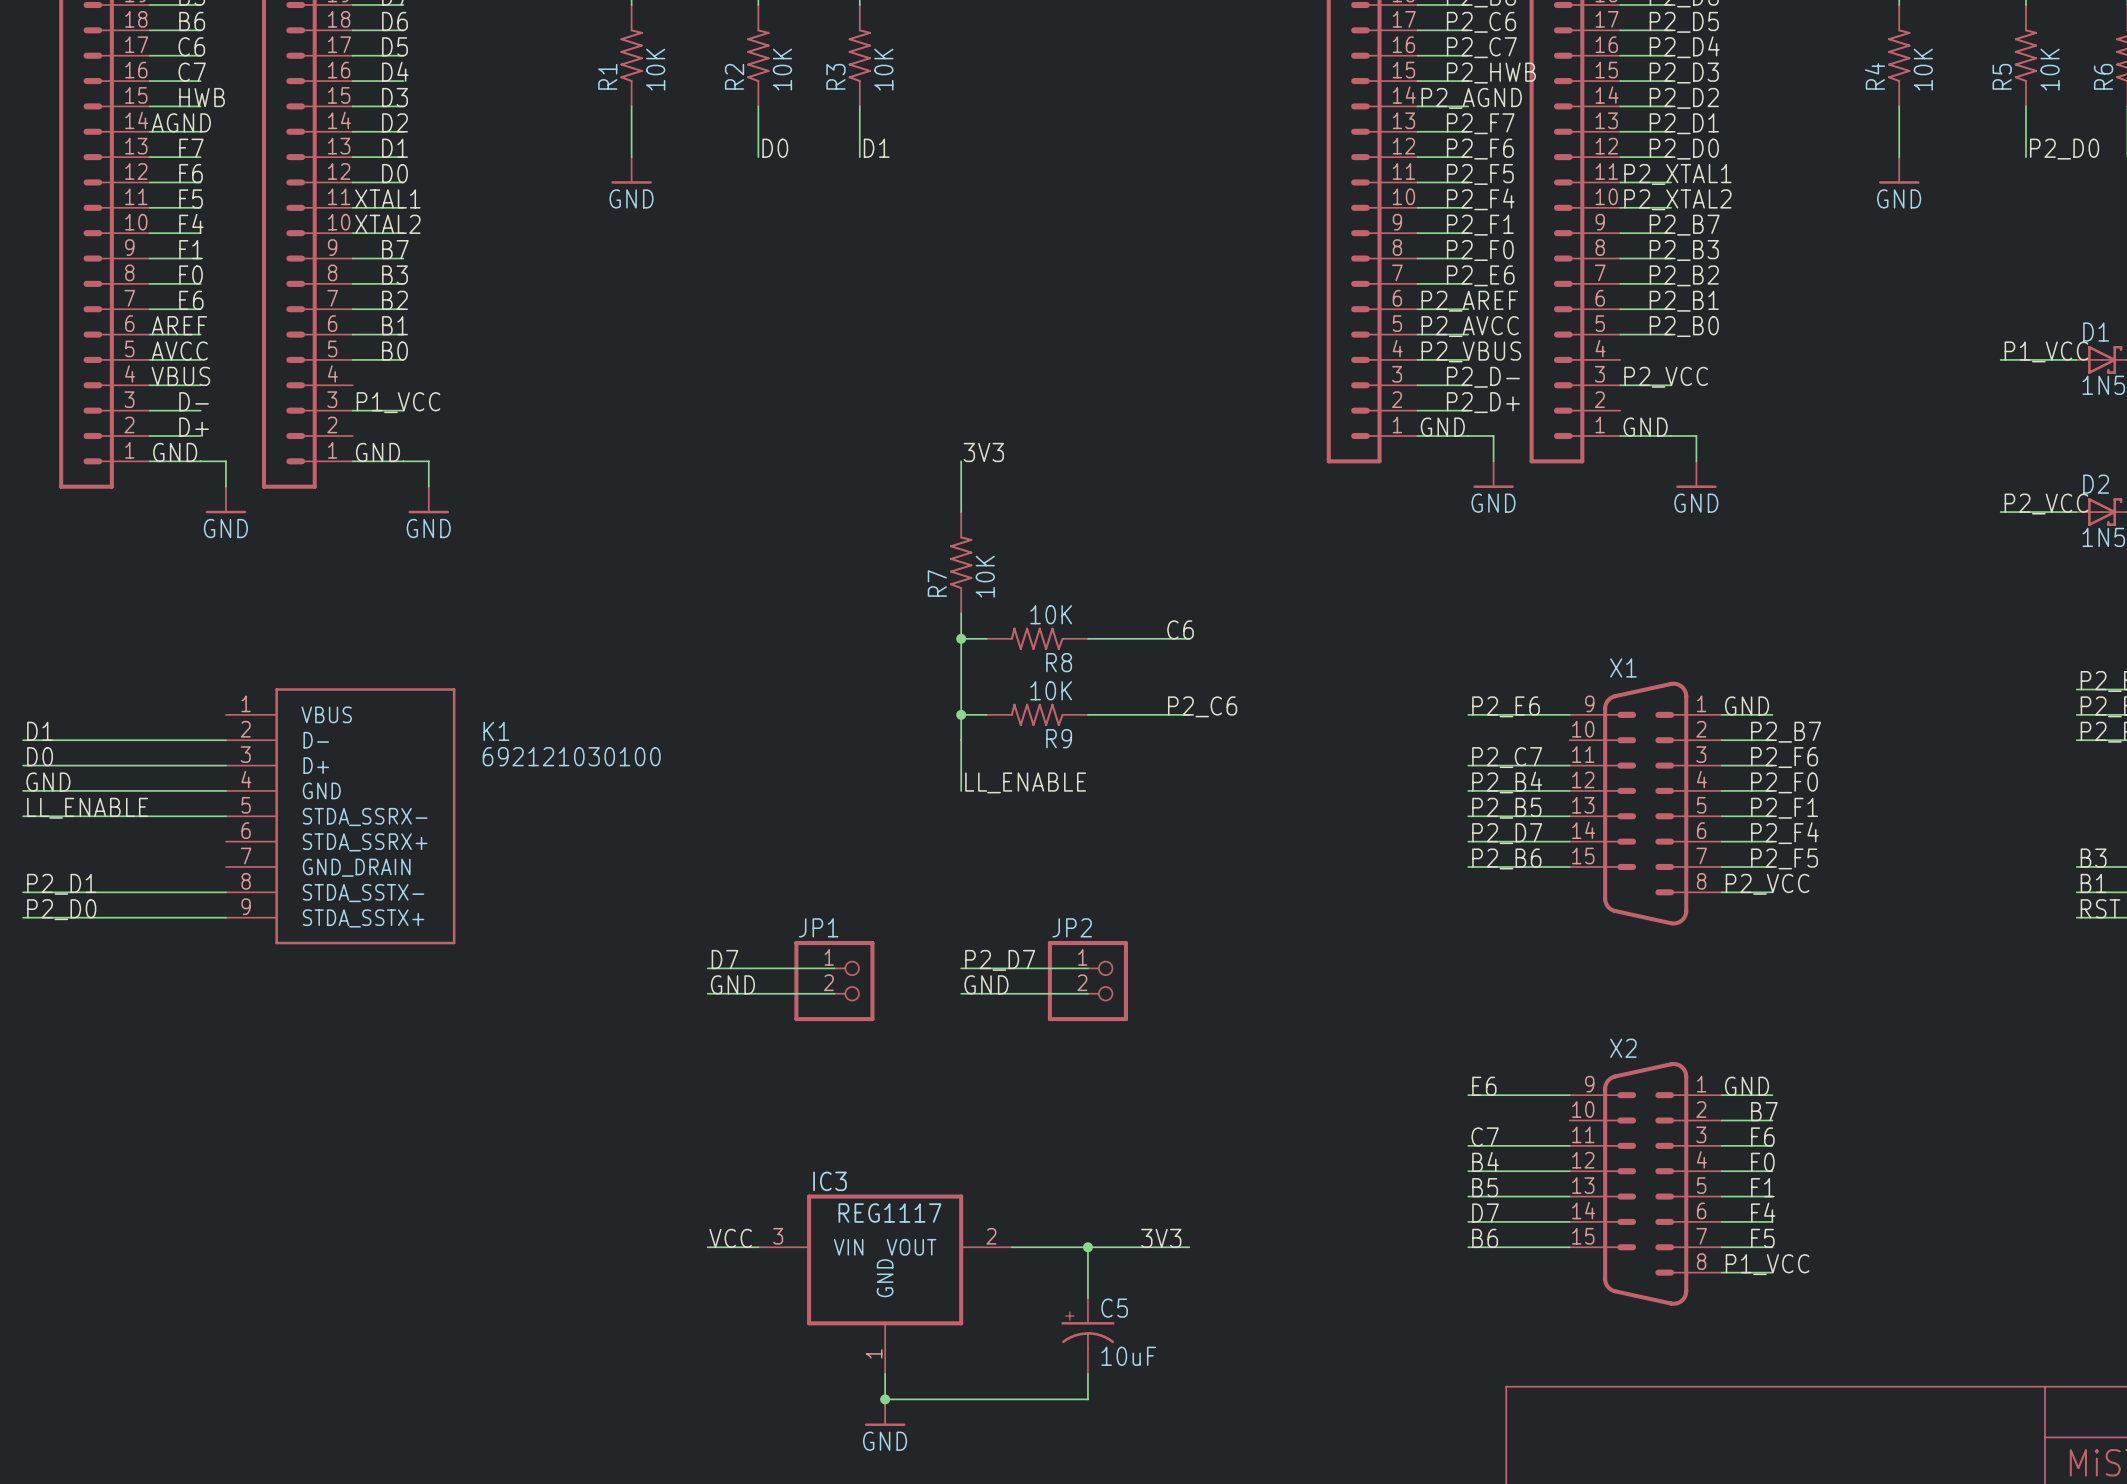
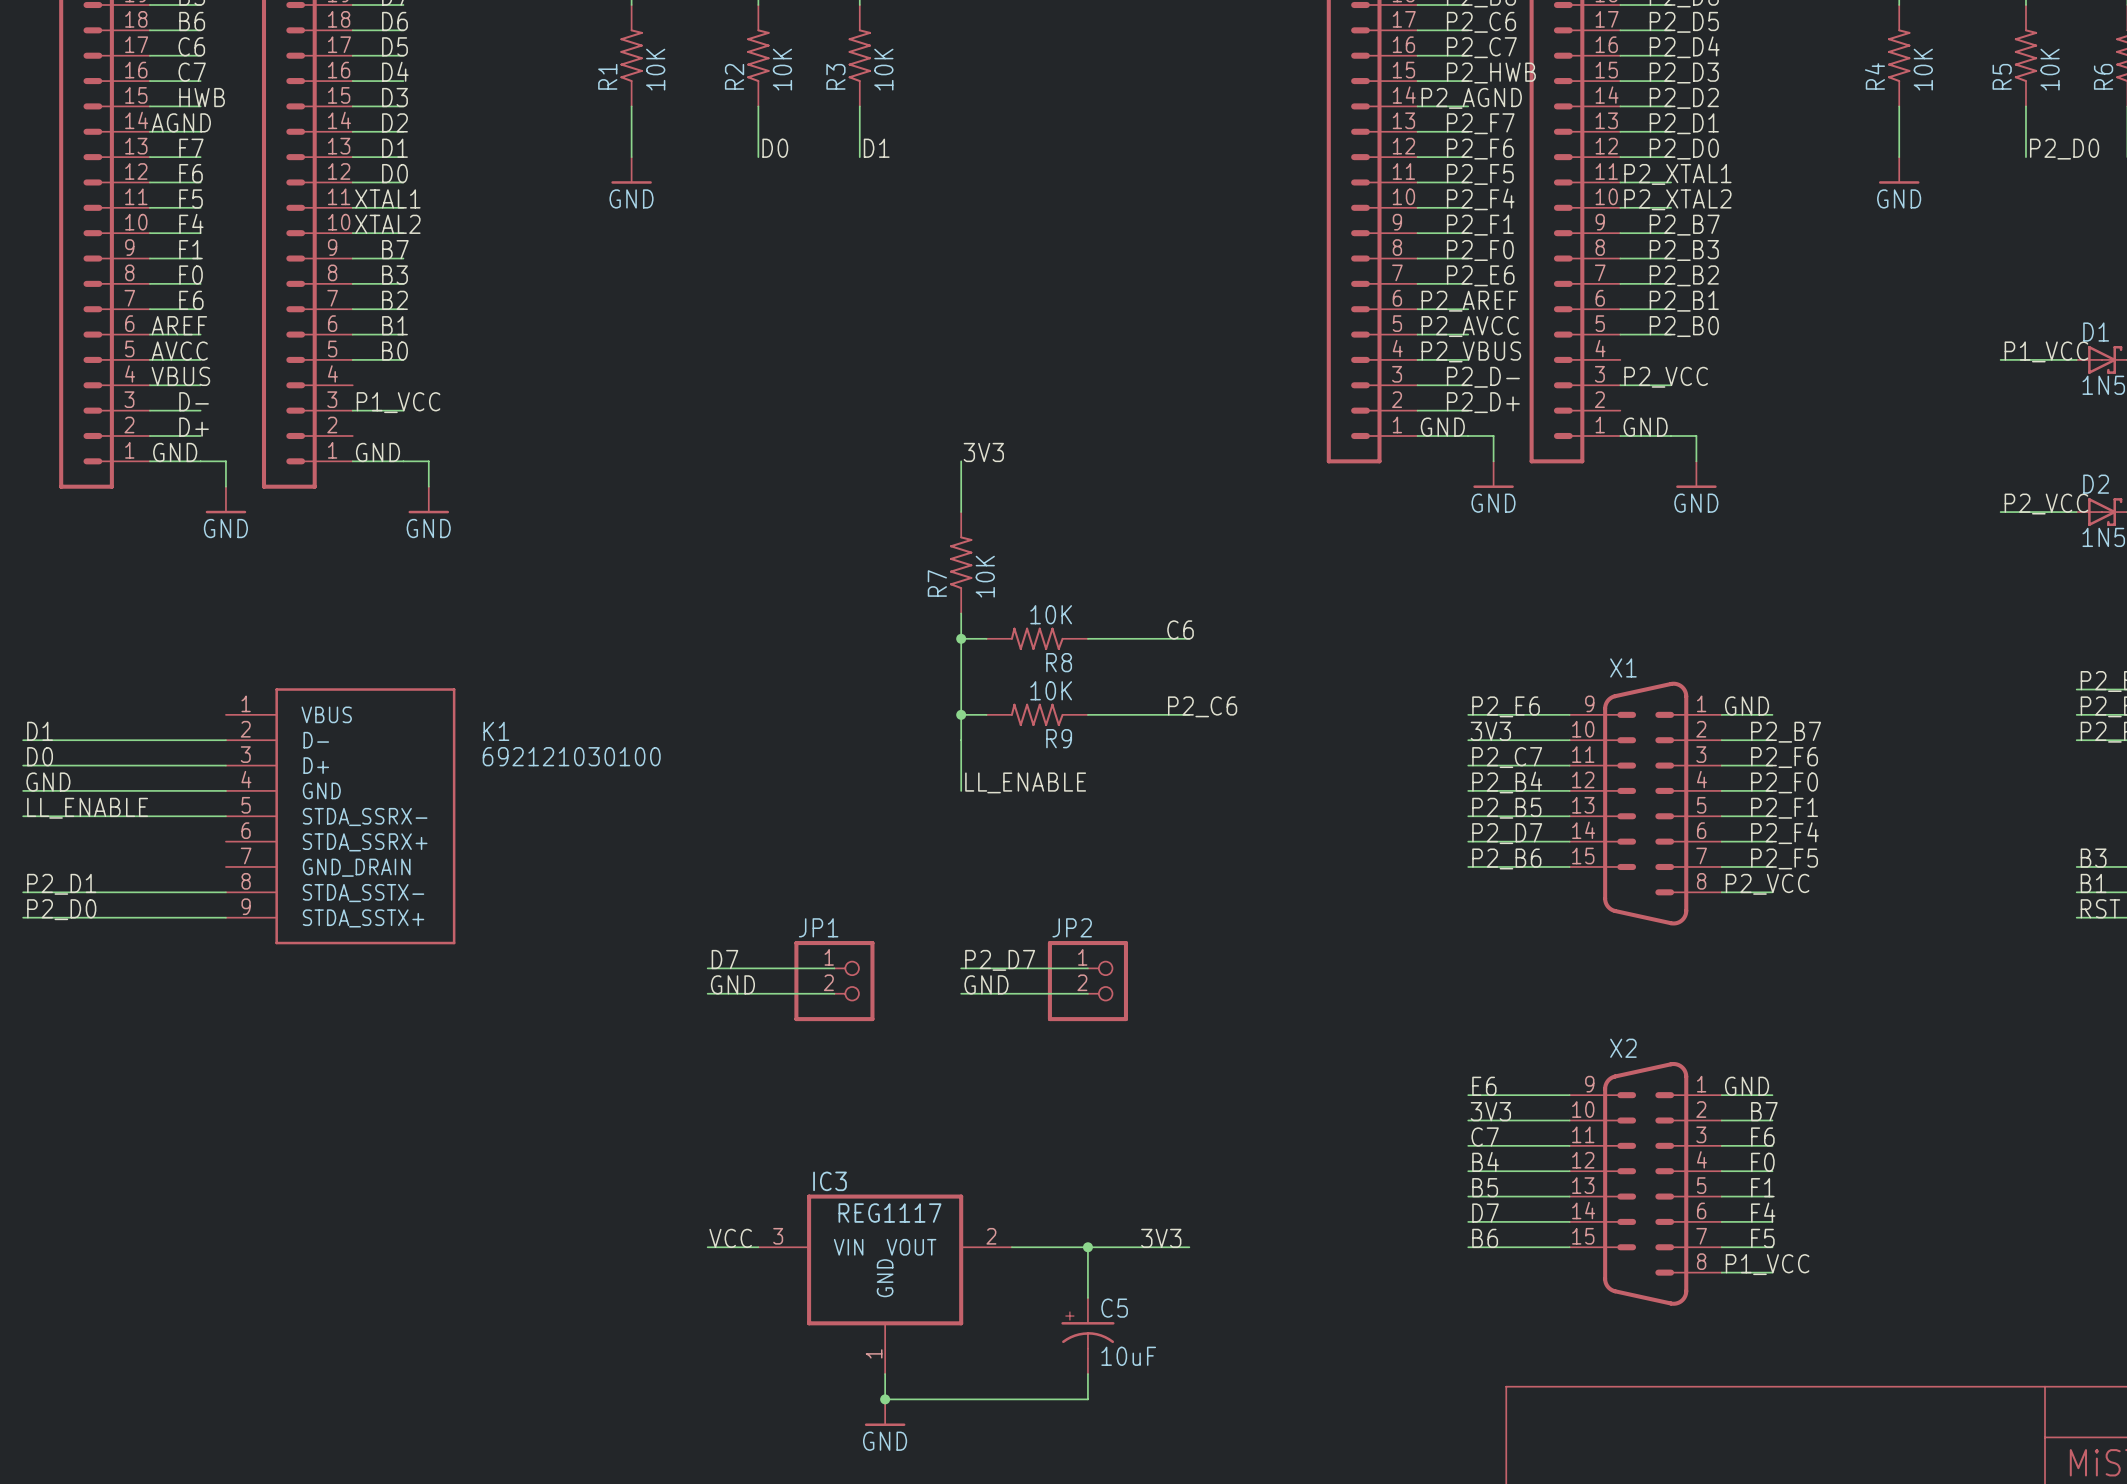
label: none -> 3V3 (1490, 731)
wire: none -> (1468, 740) (1569, 740)
label: none -> 3V3 (1490, 1111)
wire: none -> (1468, 1120) (1569, 1120)

